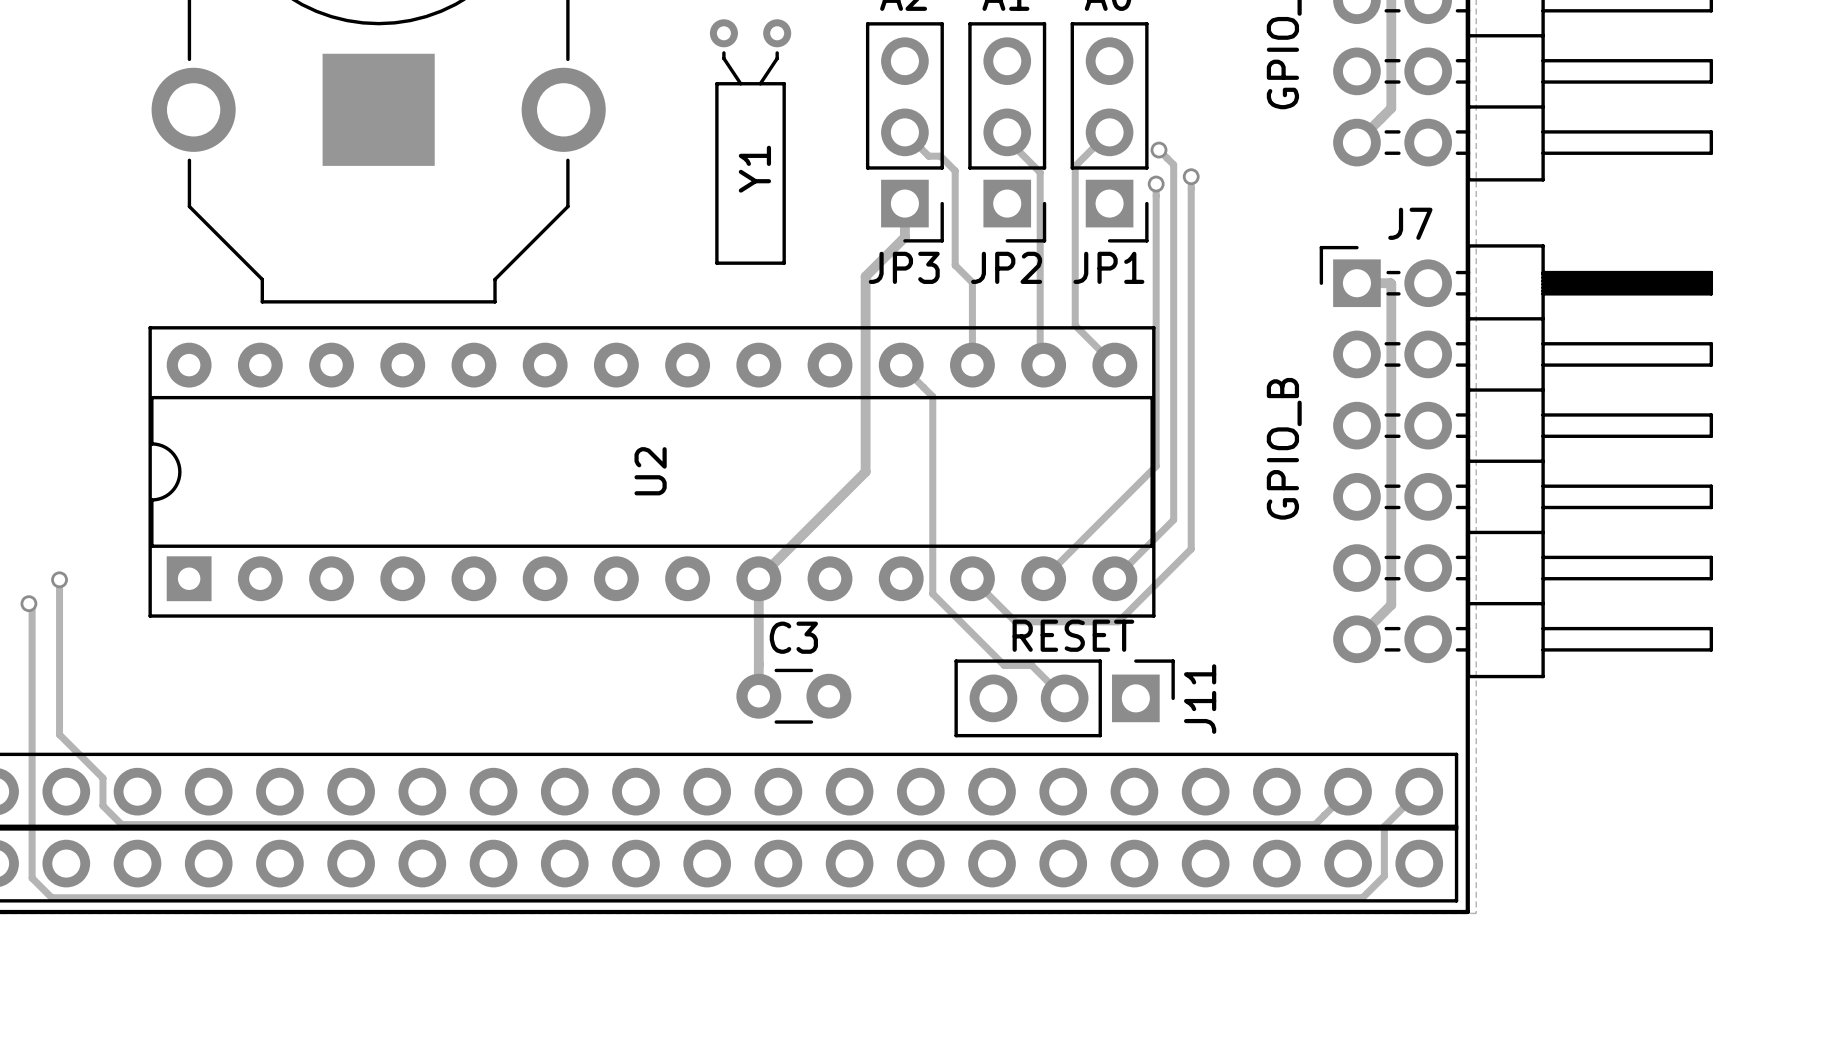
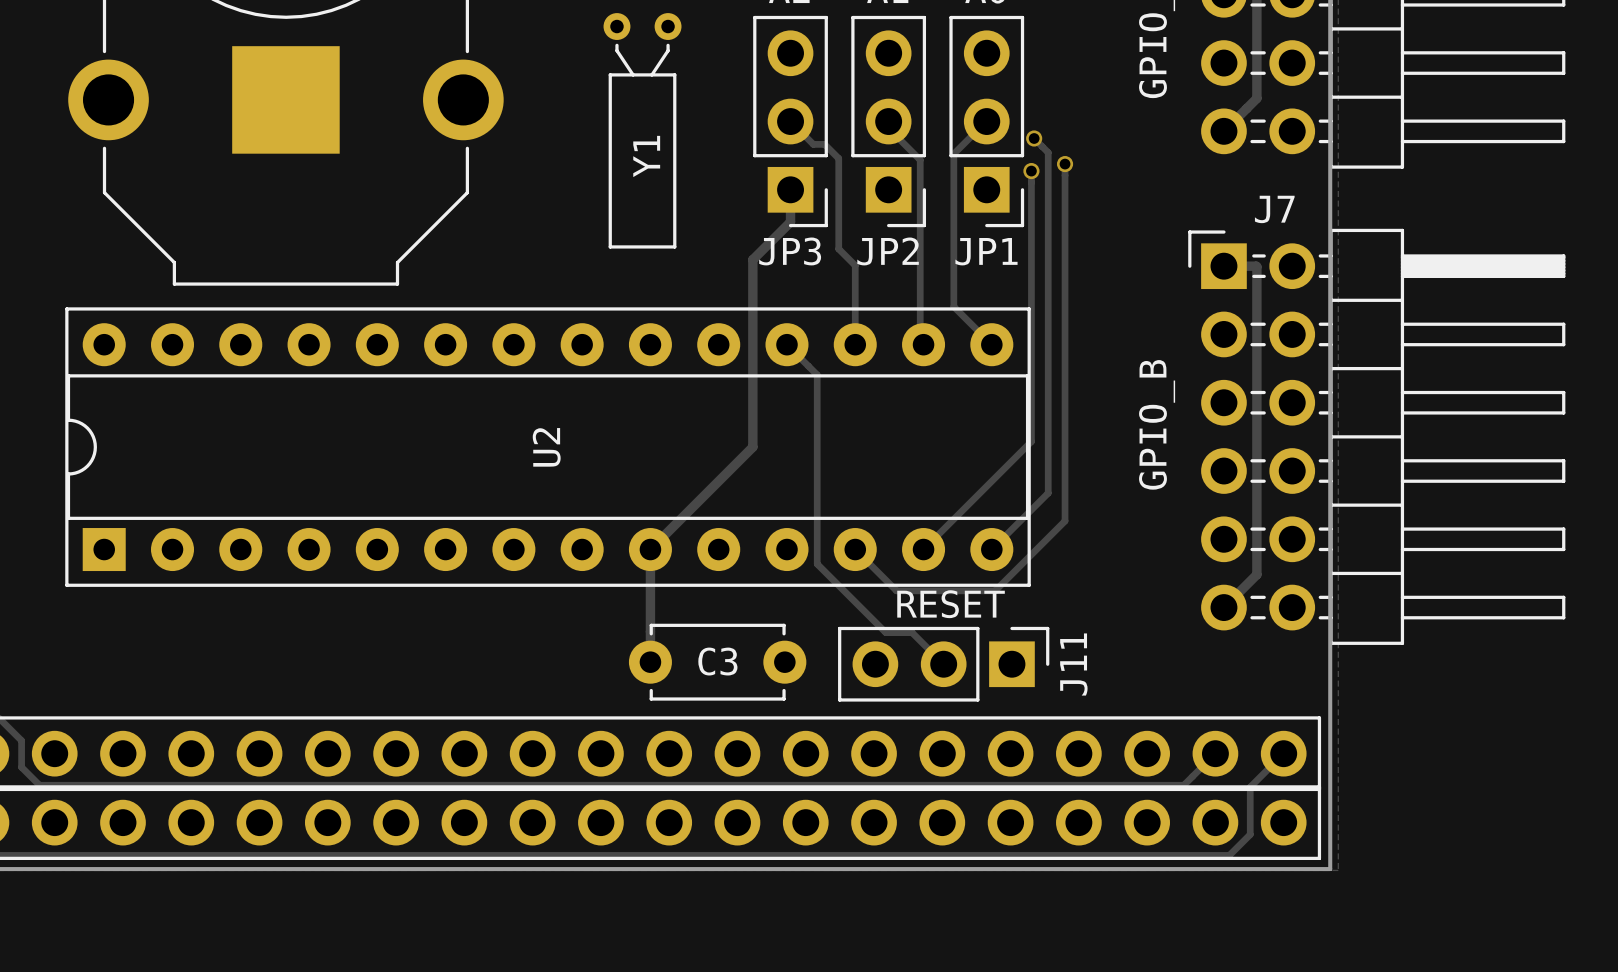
C3 name position: C3 (793, 637) -> C3 (717, 661)
C3 footprint: [736, 668, 852, 724] -> [628, 623, 807, 701]

